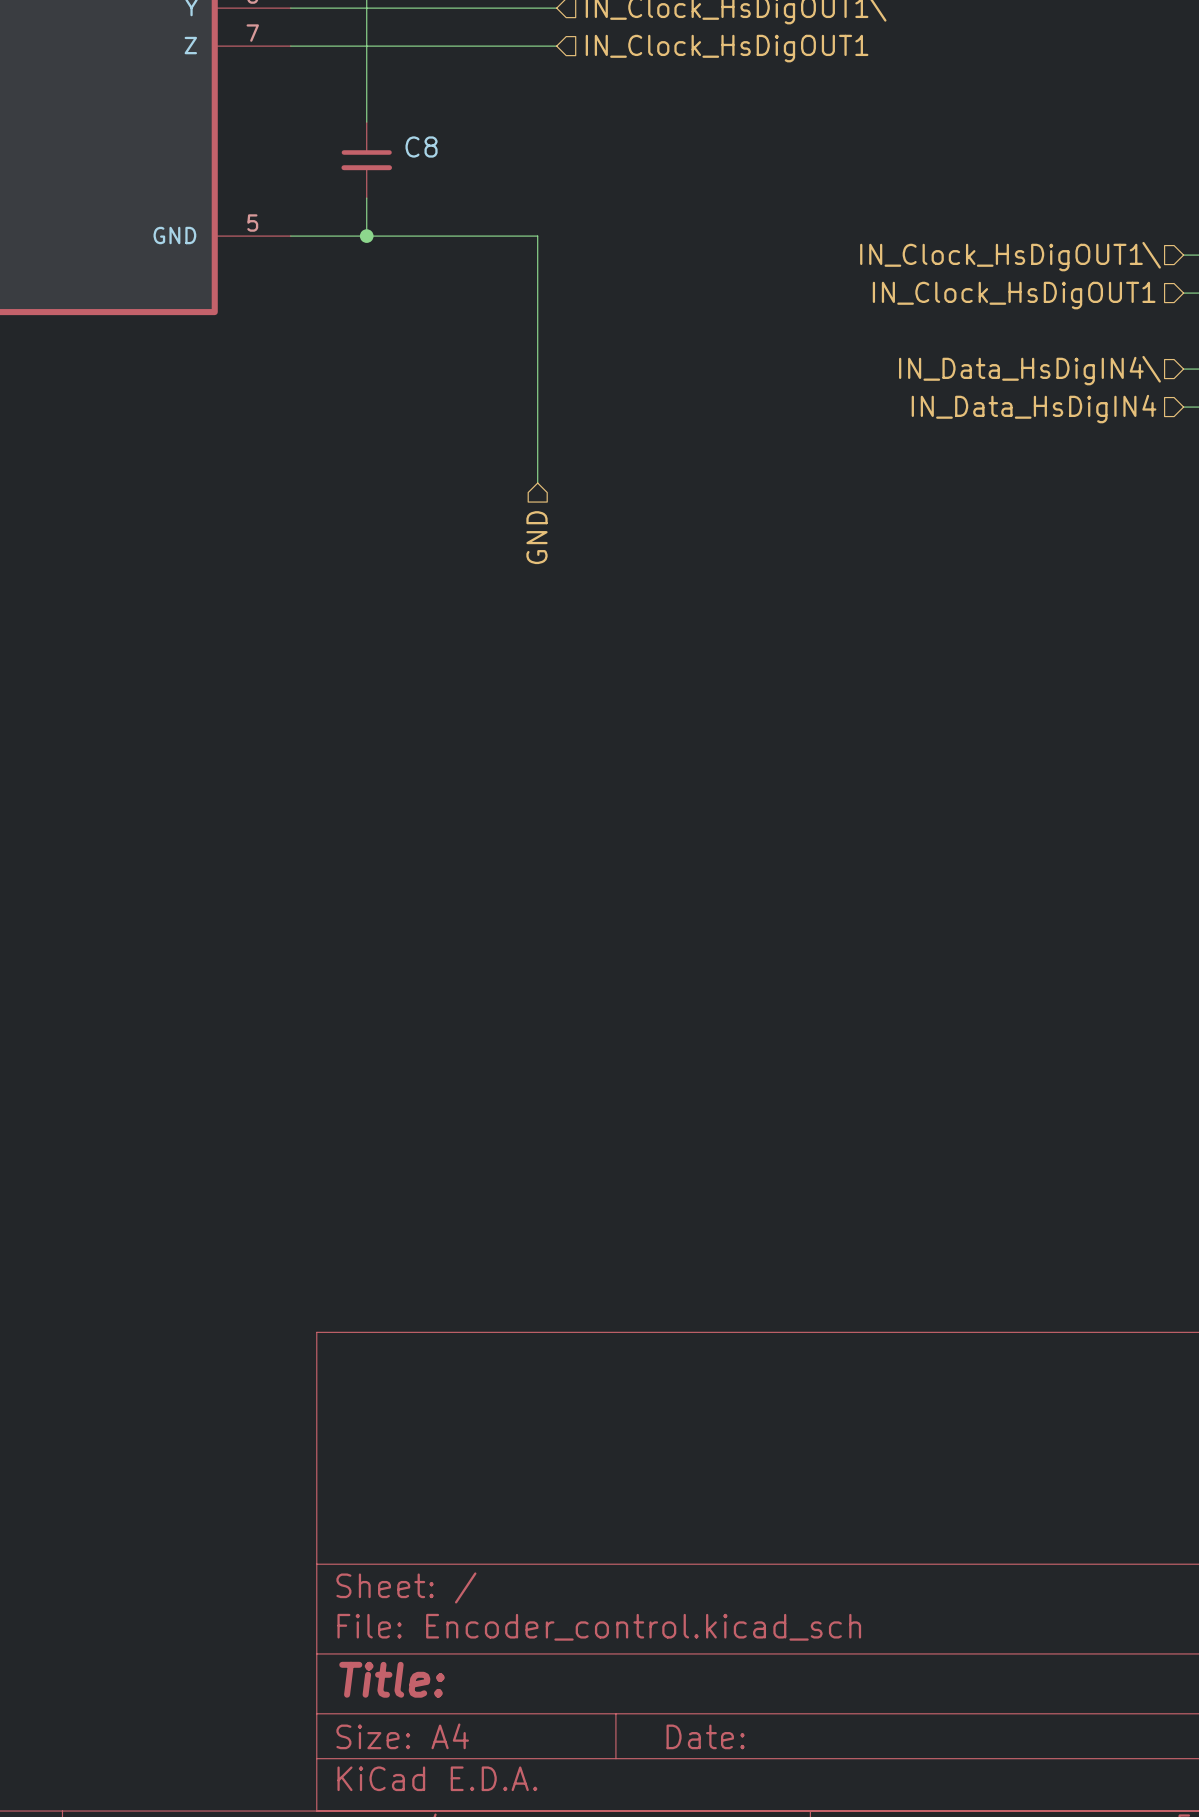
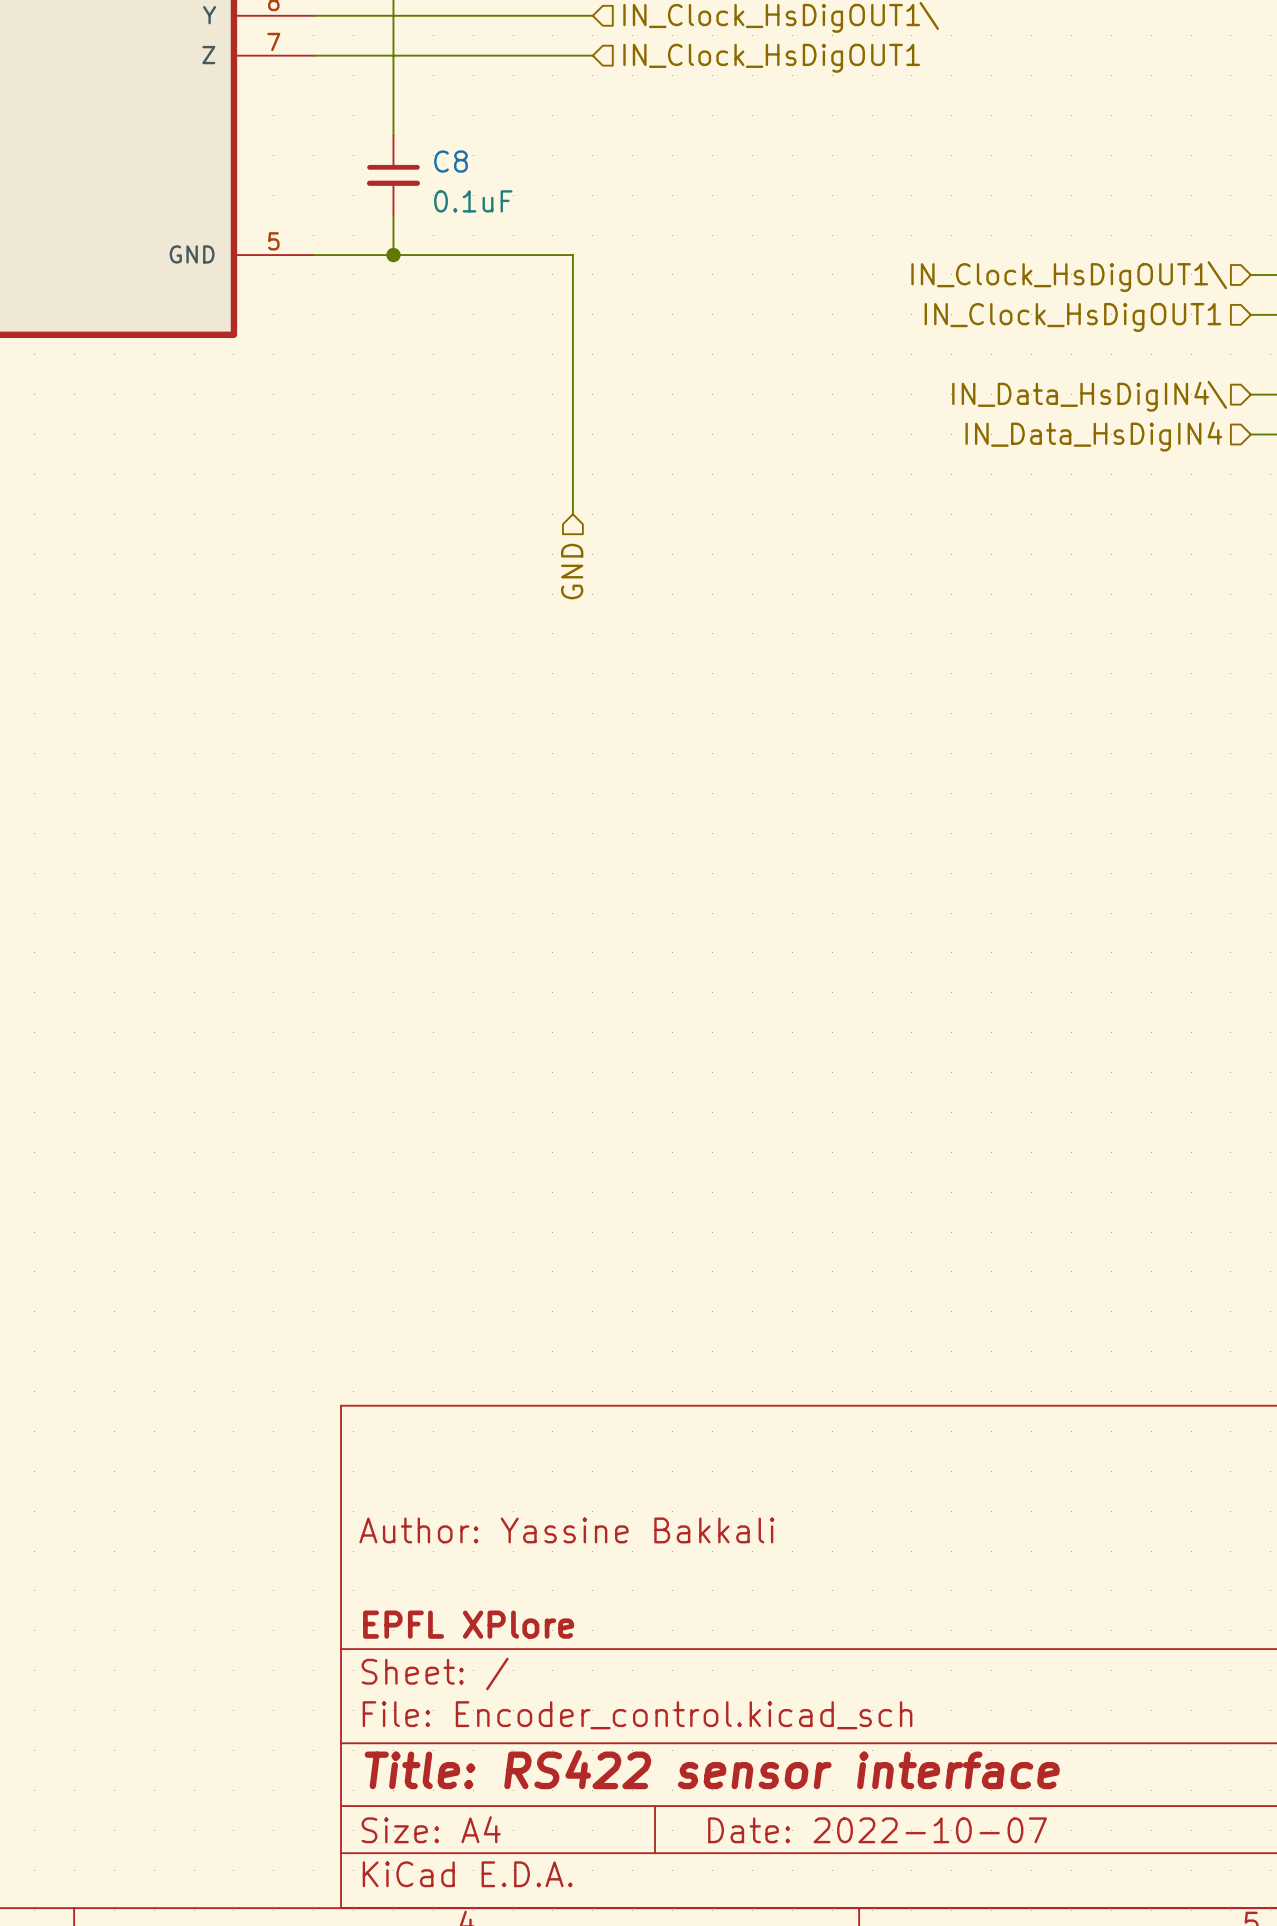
C8 value: none -> 0.1uF (473, 201)
title block: none -> Author: Yassine Bakkali (566, 1530)
title block: none -> EPFL XPlore (468, 1624)
title block: Title: (392, 1679) -> Title: RS422 sensor interface (712, 1769)
title block: Date: (705, 1736) -> Date: 2022-10-07 (877, 1830)

